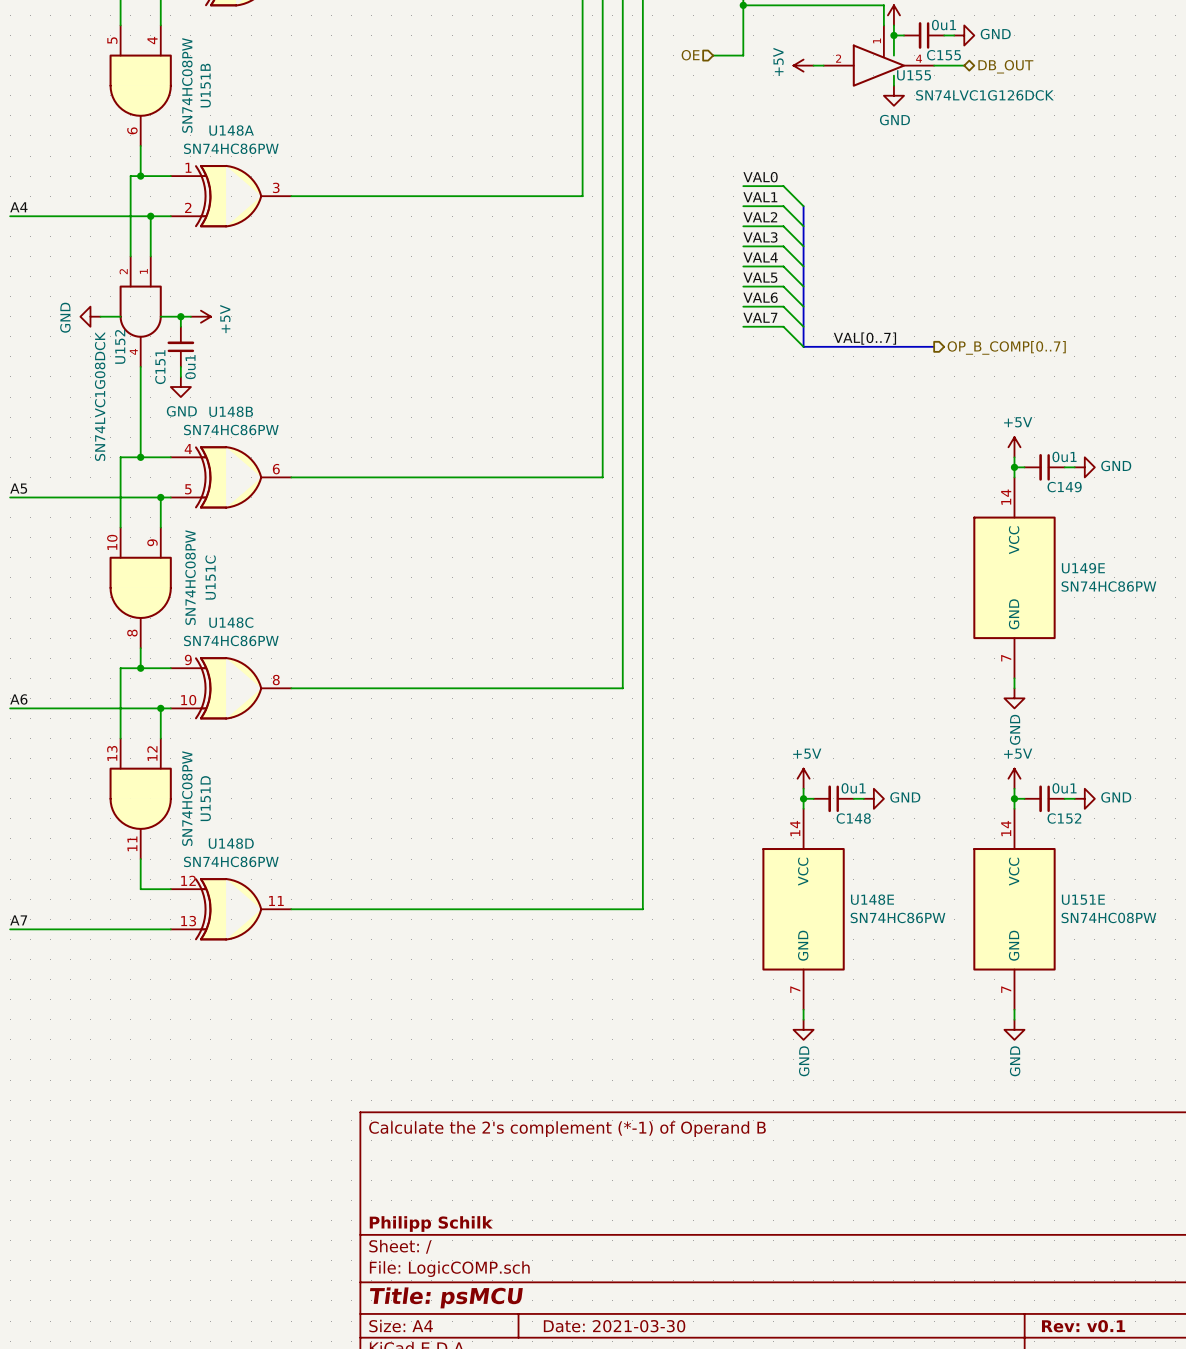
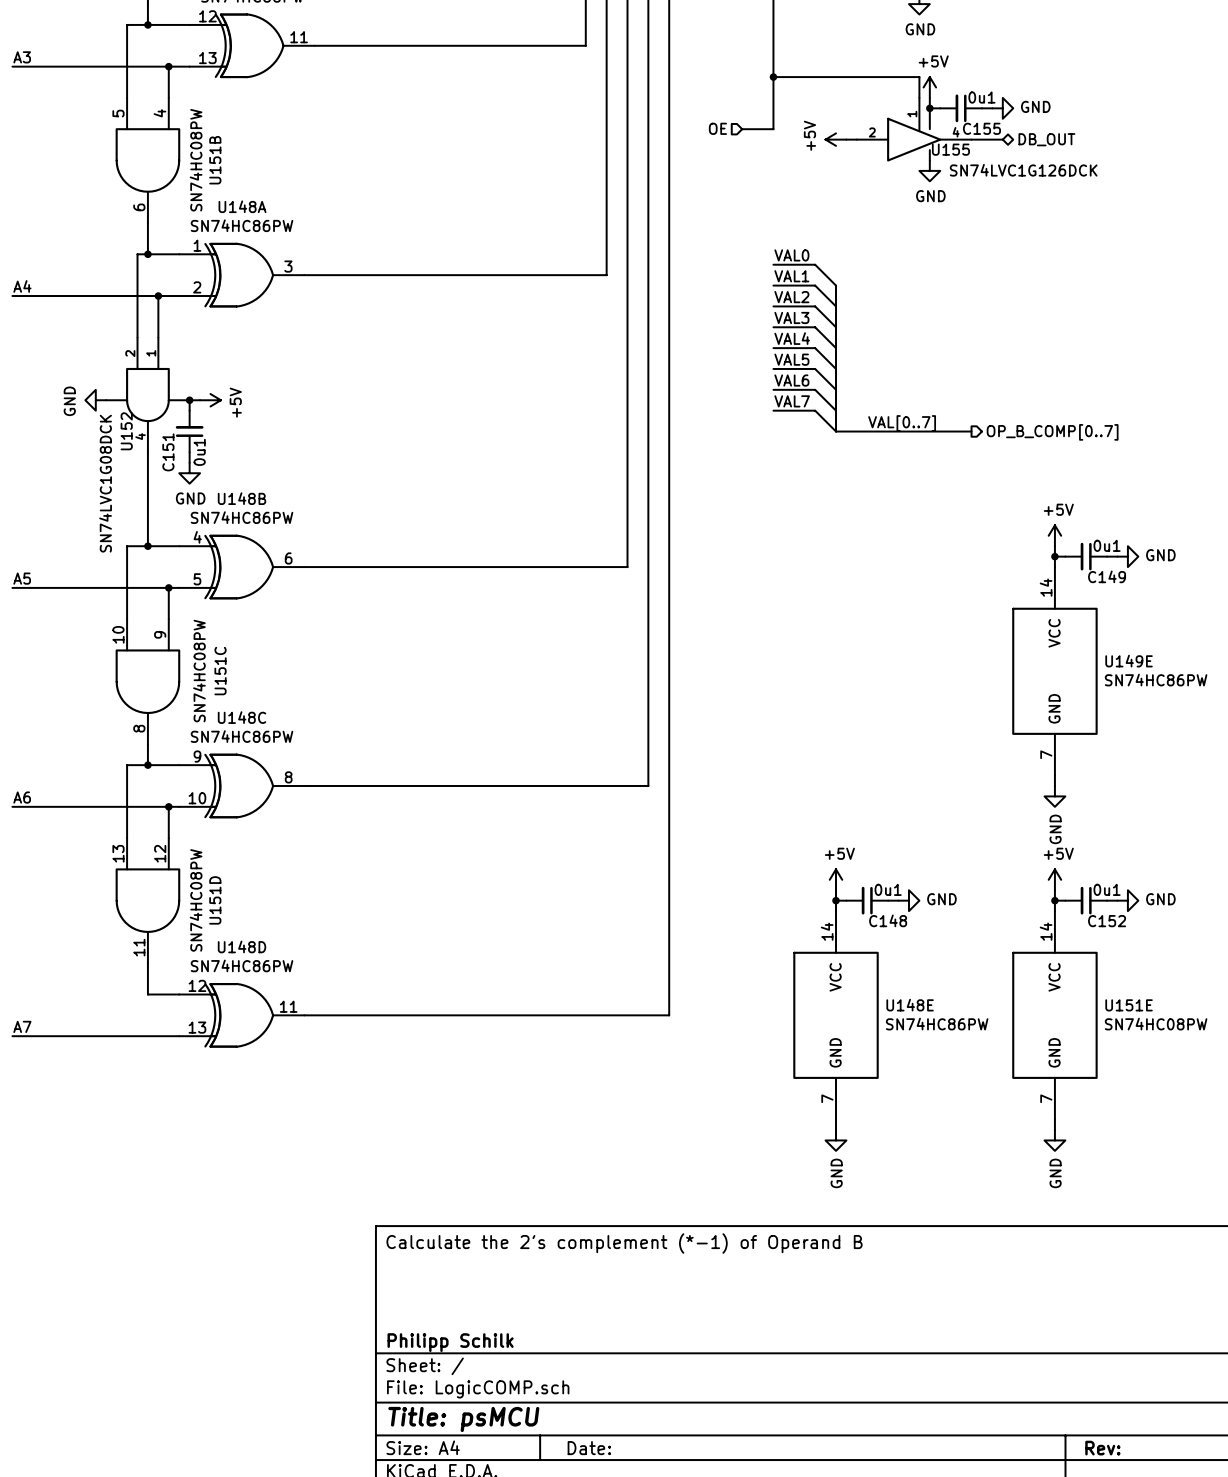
title block: Date: 2021-03-30 (614, 1326) -> Date: (589, 1448)
title block: Rev: v0.1 (1083, 1326) -> Rev: (1102, 1448)

